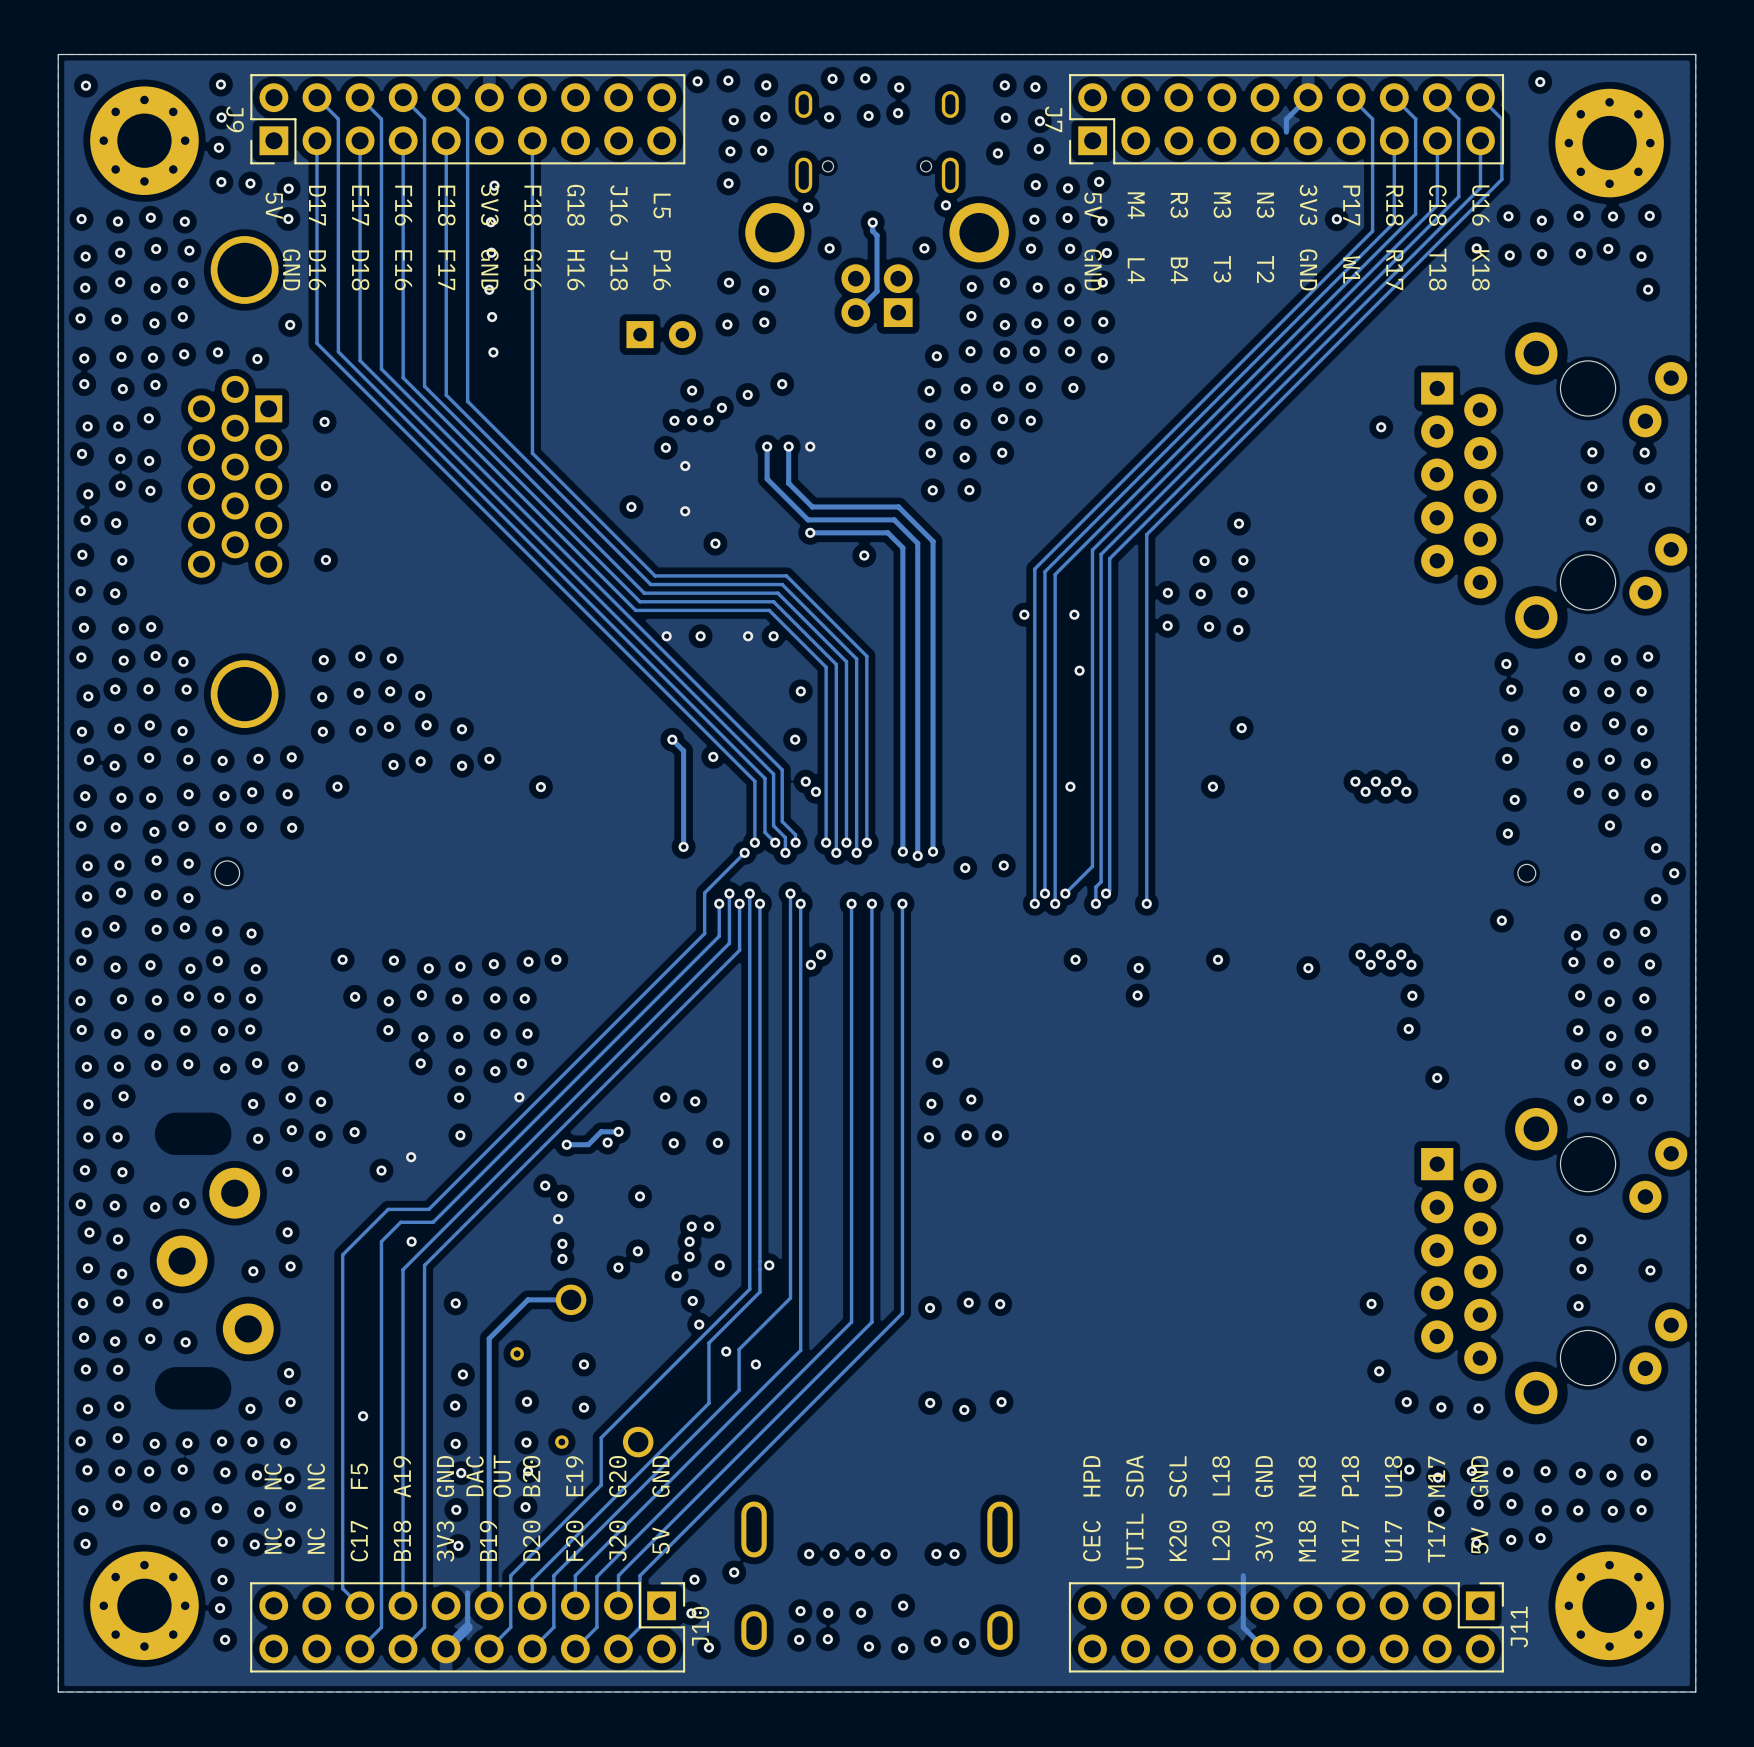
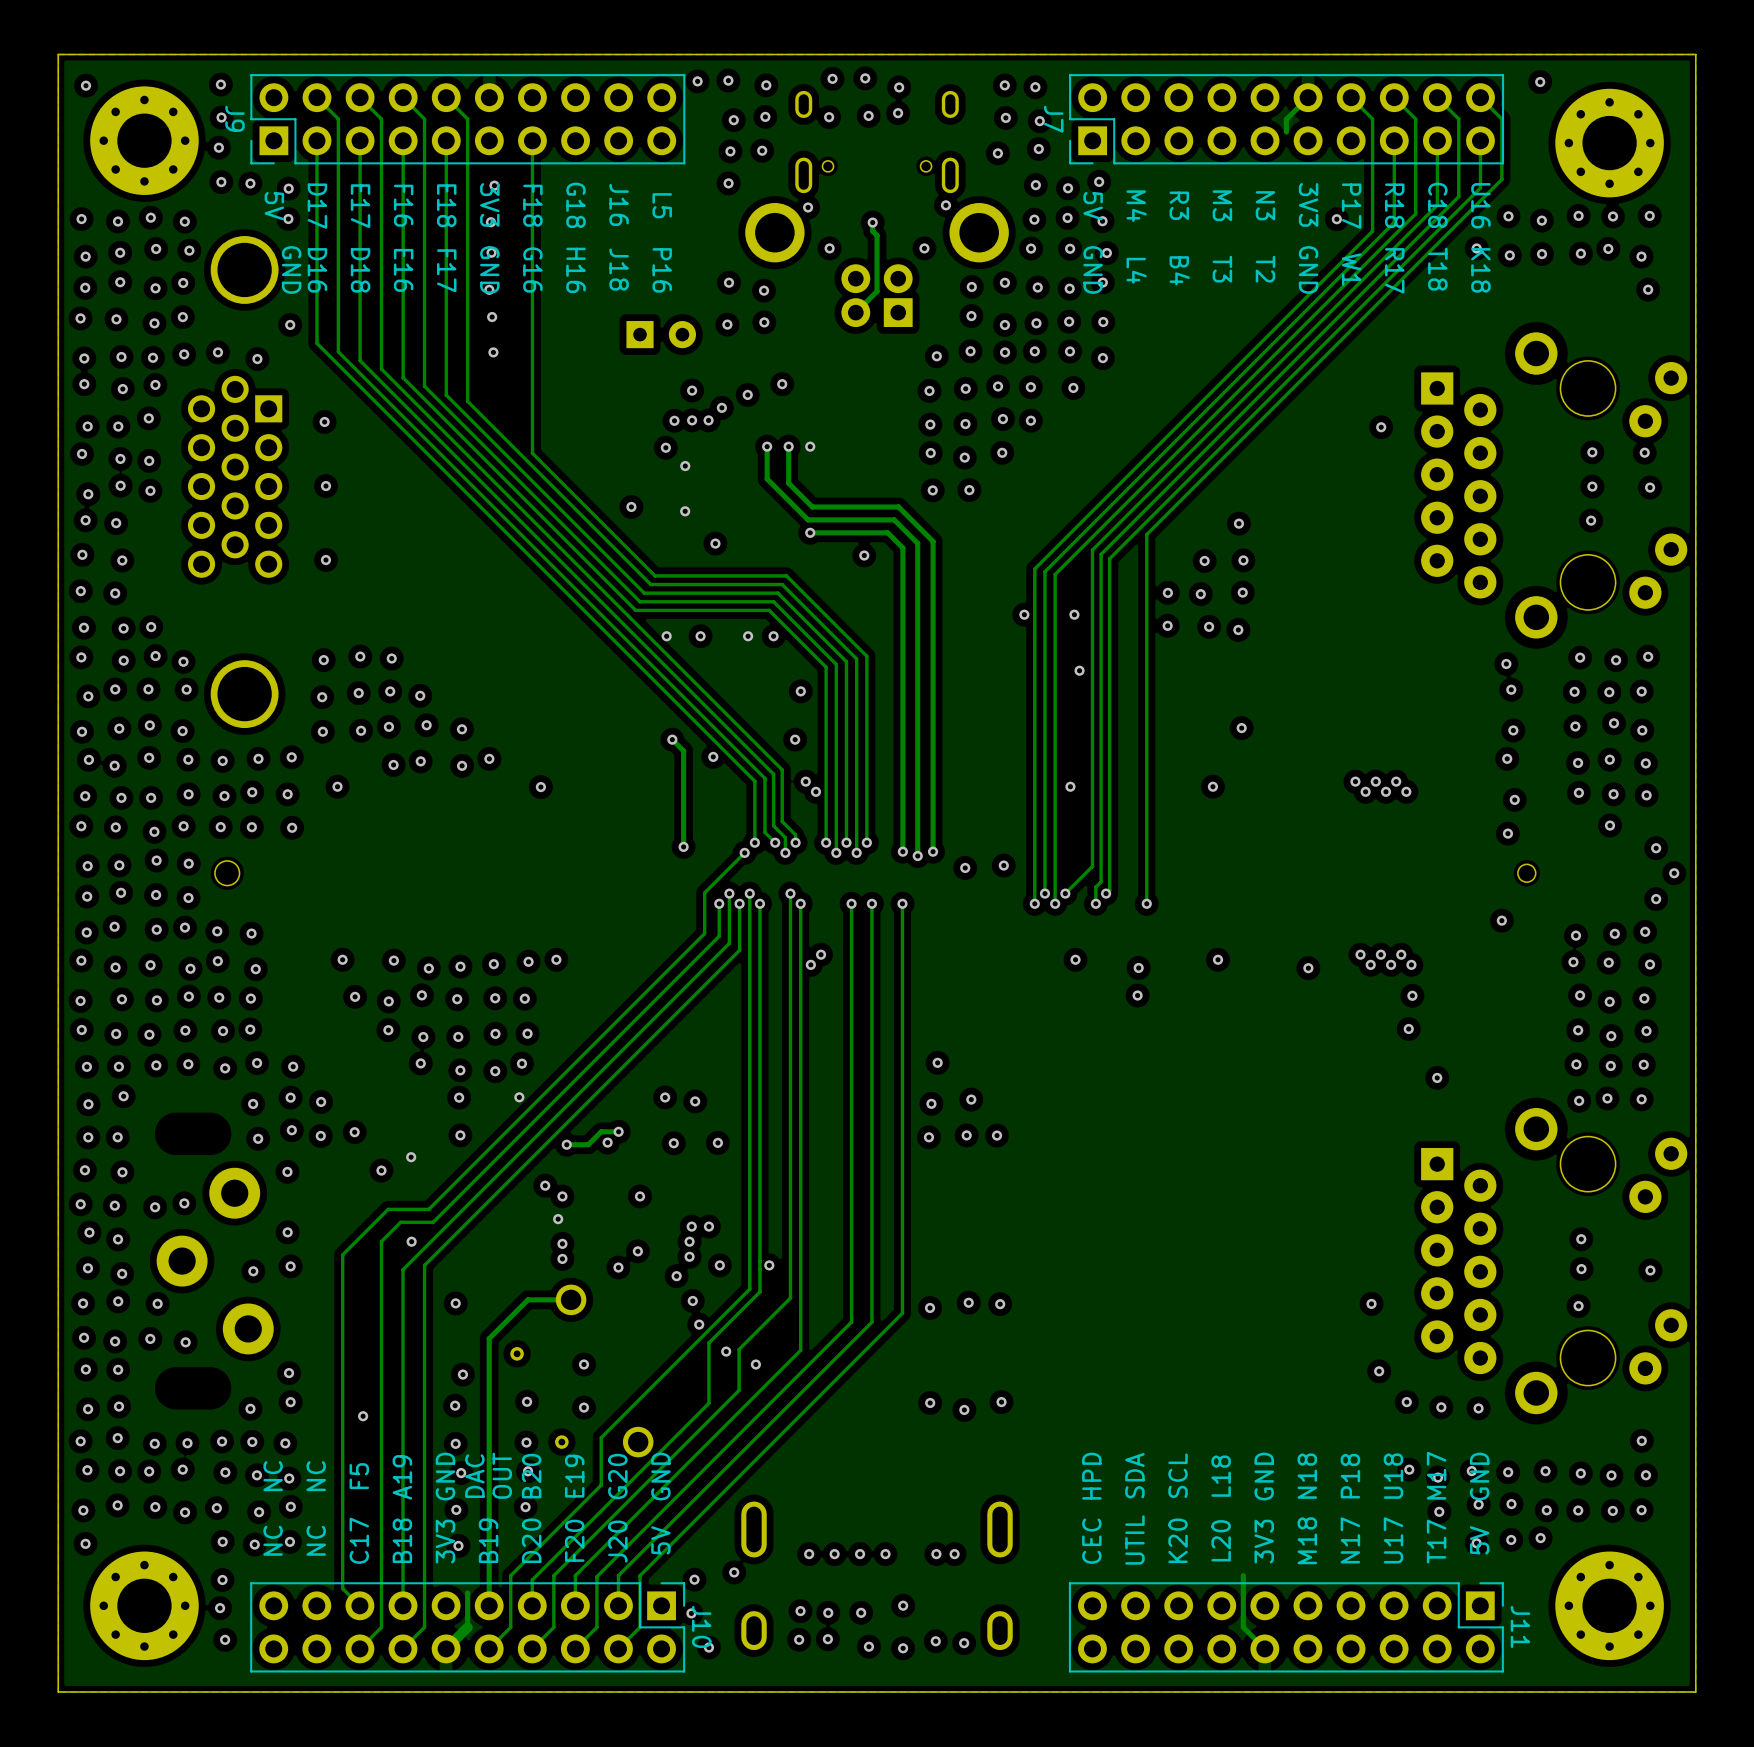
J10 name rotation: 0° (700, 1627) -> 180° (701, 1626)
J11 name rotation: 0° (1519, 1627) -> 180° (1520, 1626)

